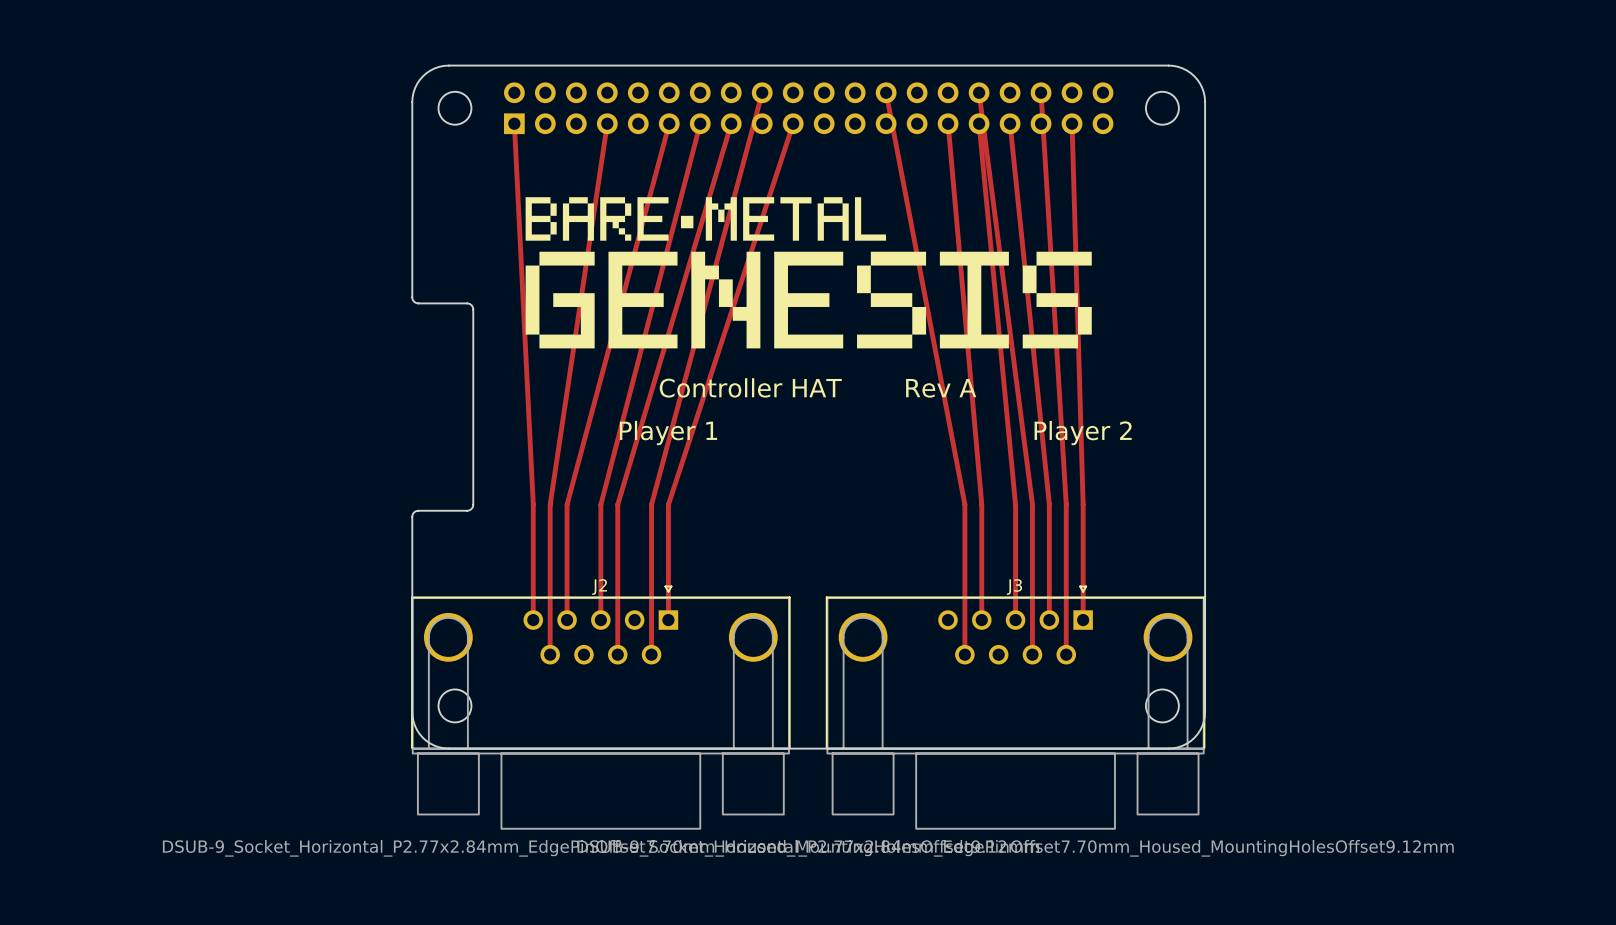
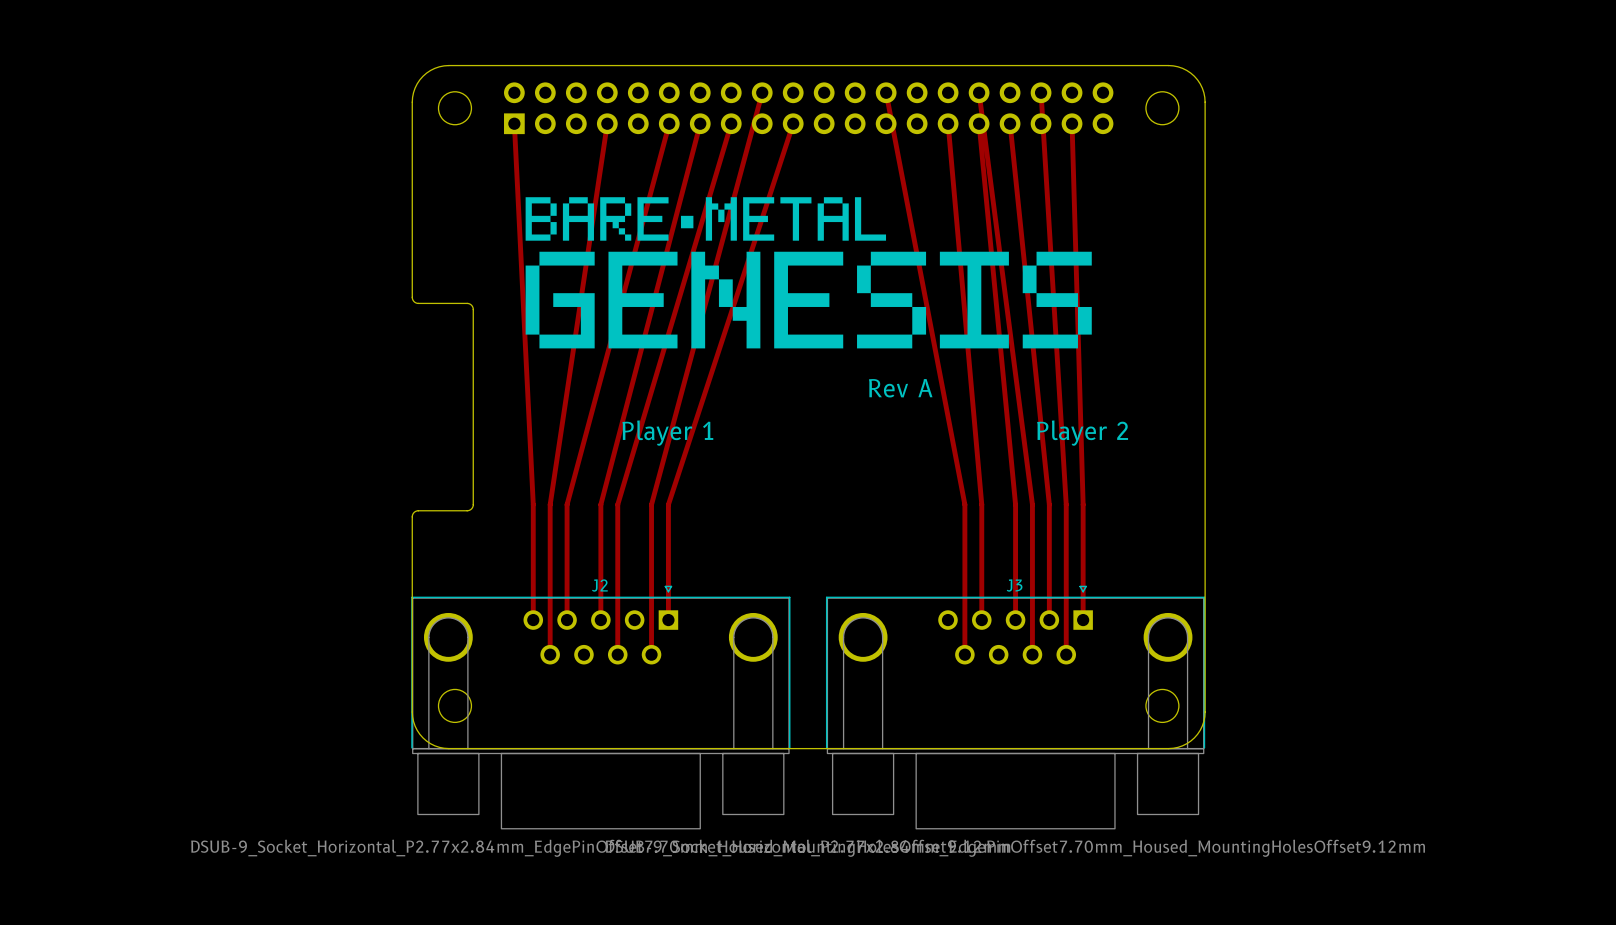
text: Controller HAT (750, 387) -> none
text position: Rev A (941, 388) -> Rev A (900, 388)

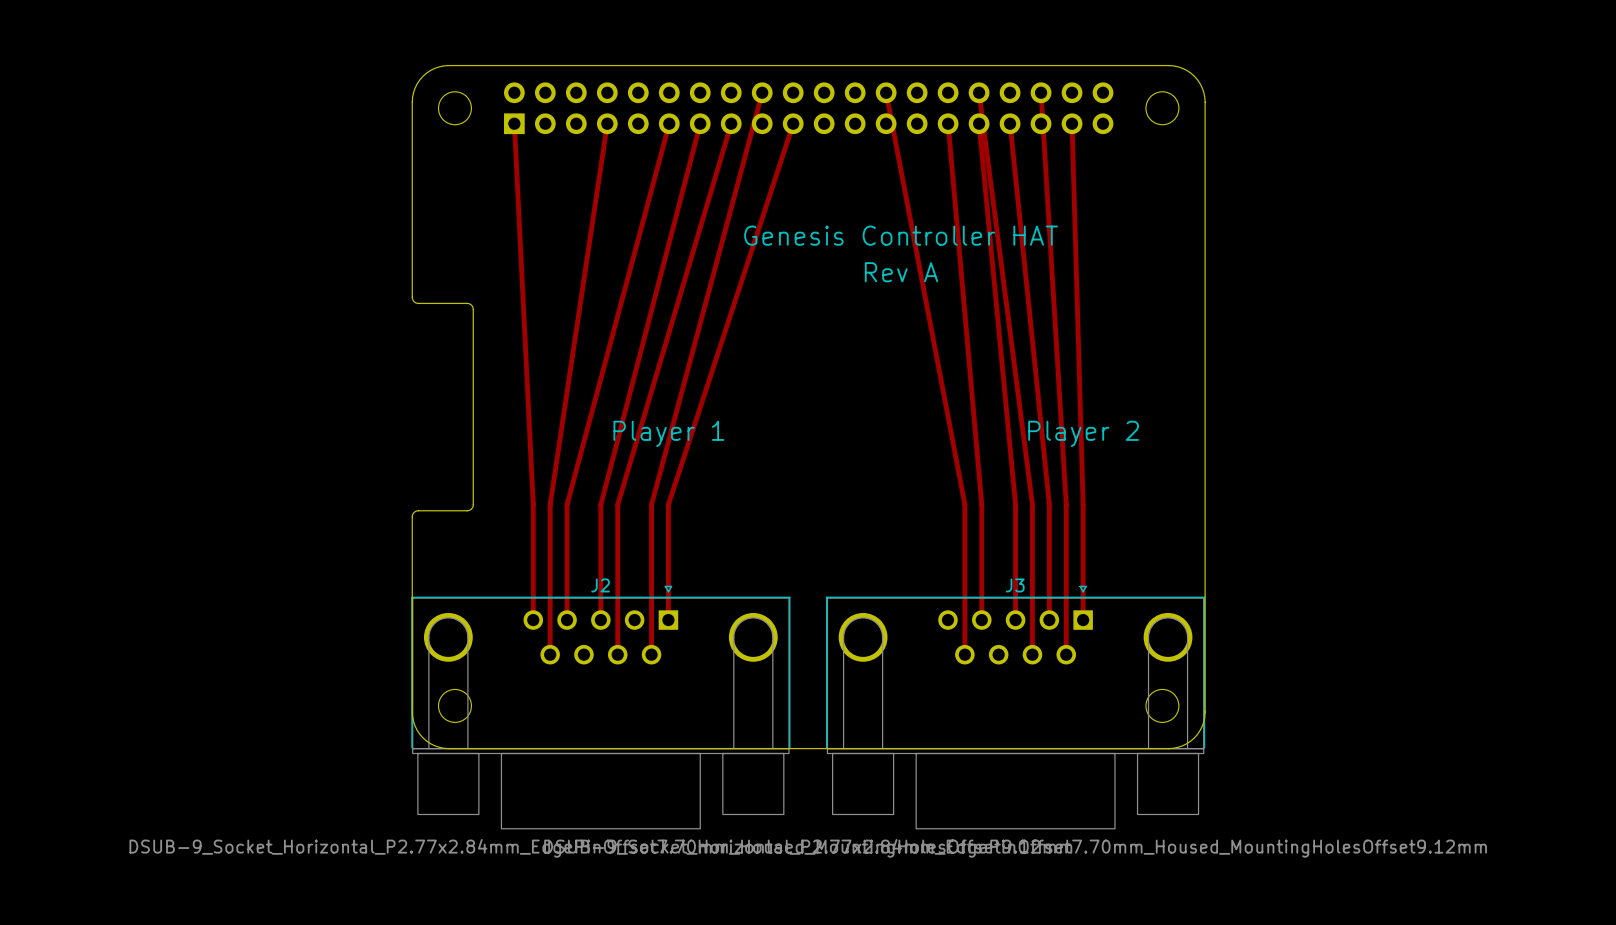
drawing: [525, 197, 1092, 349] -> none
text: none -> Genesis Controller HAT (901, 235)
text position: Rev A (900, 388) -> Rev A (901, 272)

